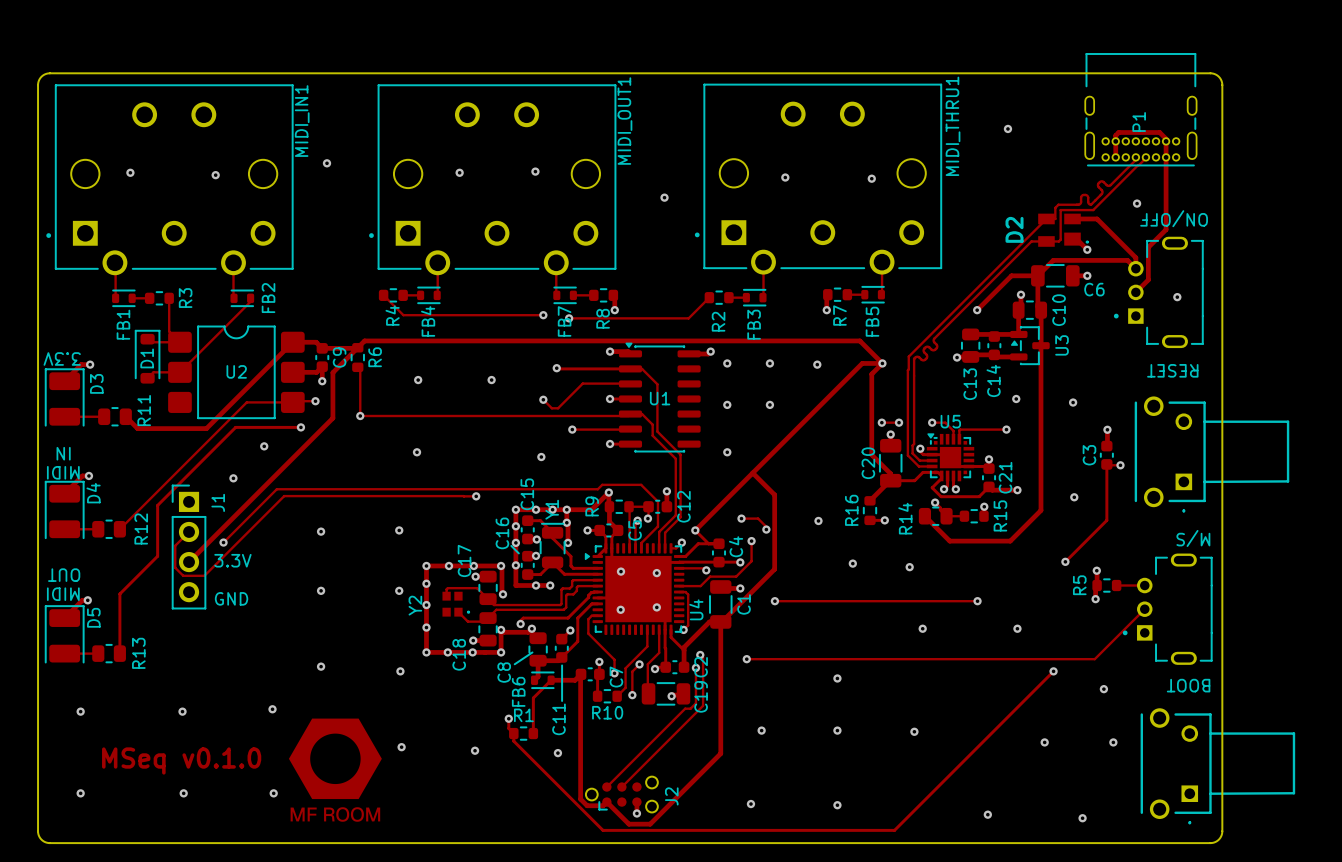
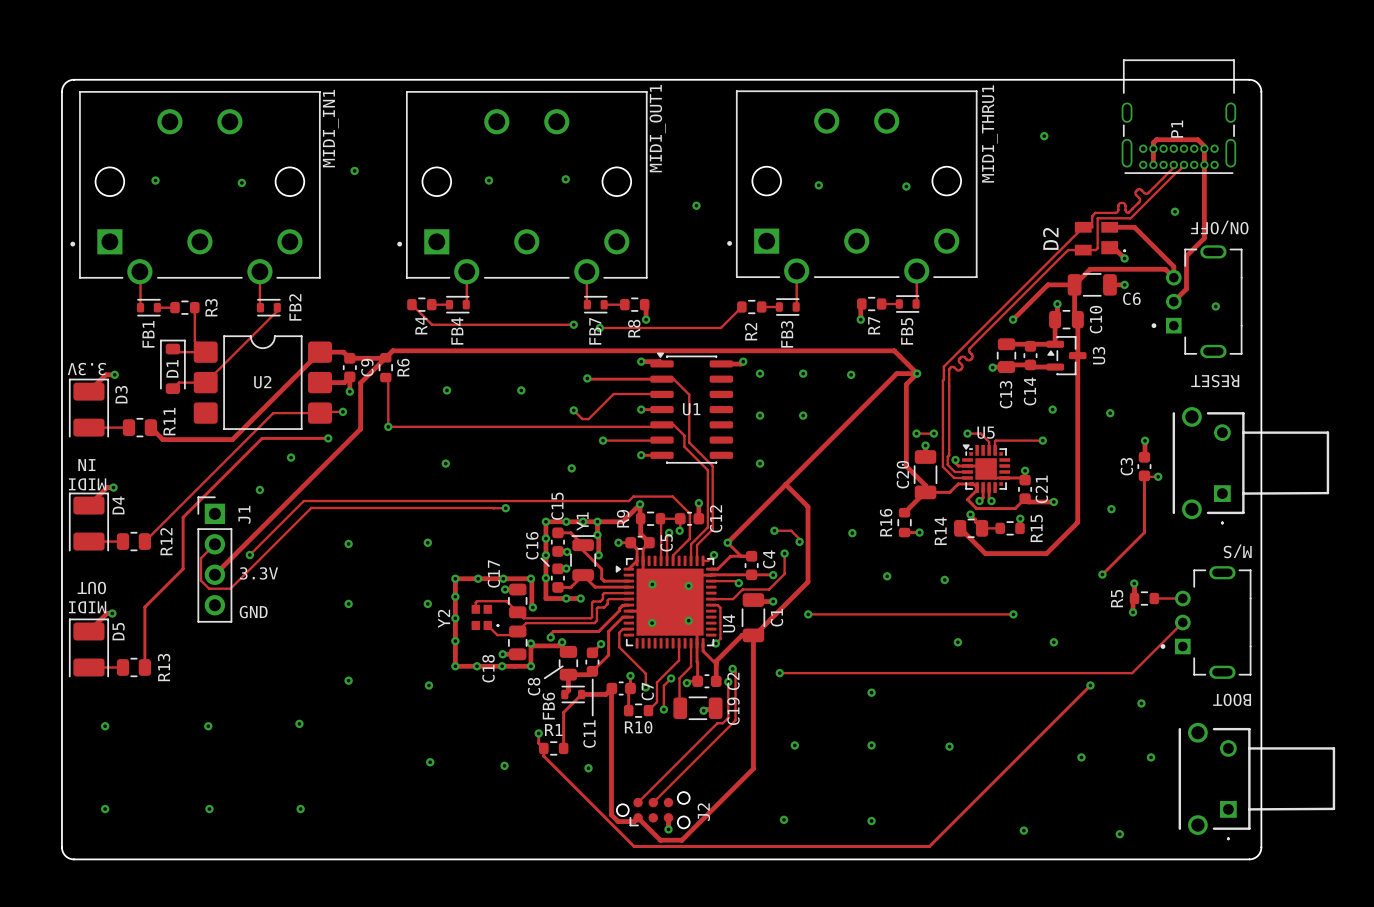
drawing: [288, 718, 382, 822] -> none
text: MSeq v0.1.0 (181, 760) -> none

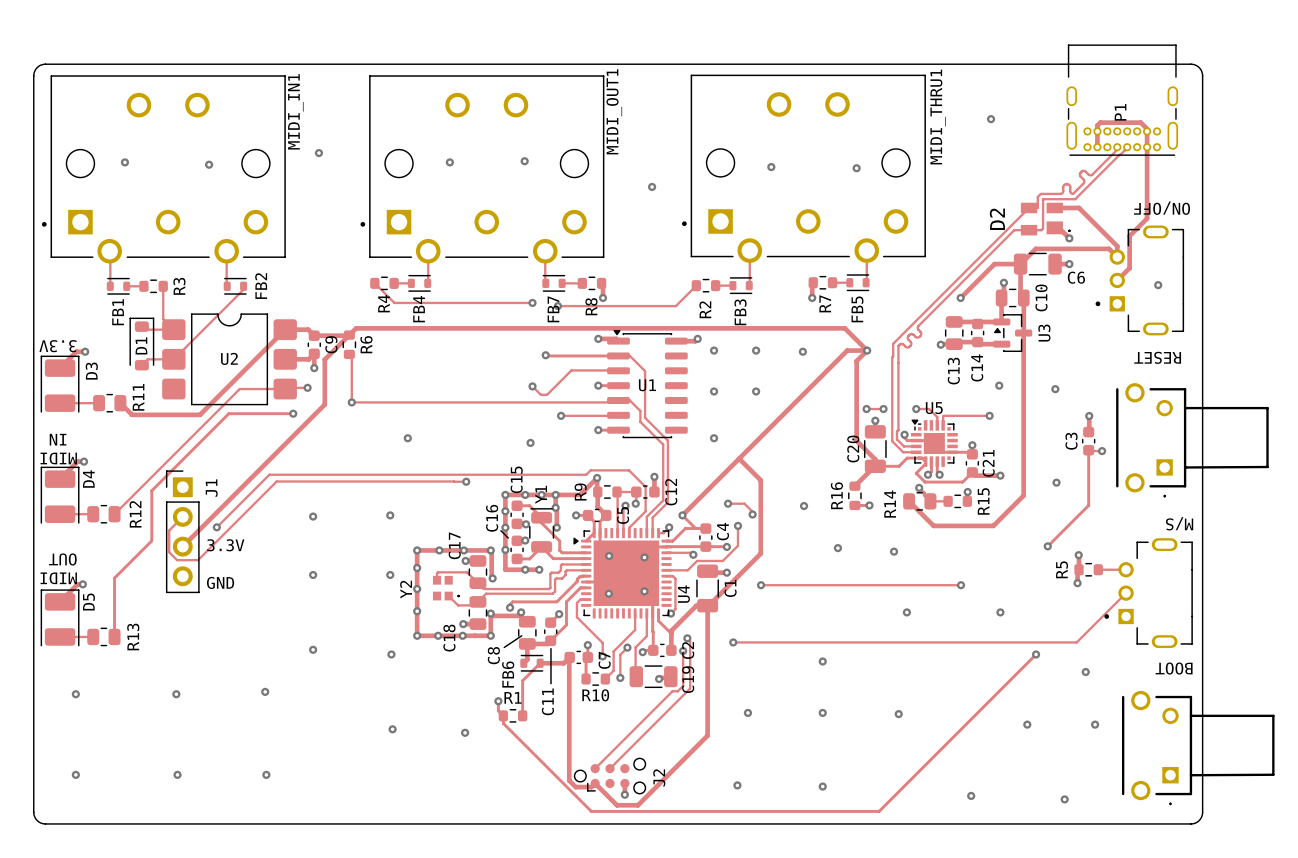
via: (1175, 211) -> none
via: (446, 390) -> none
via: (521, 390) -> none
via: (291, 457) -> none
via: (259, 489) -> none
via: (588, 768) -> none

